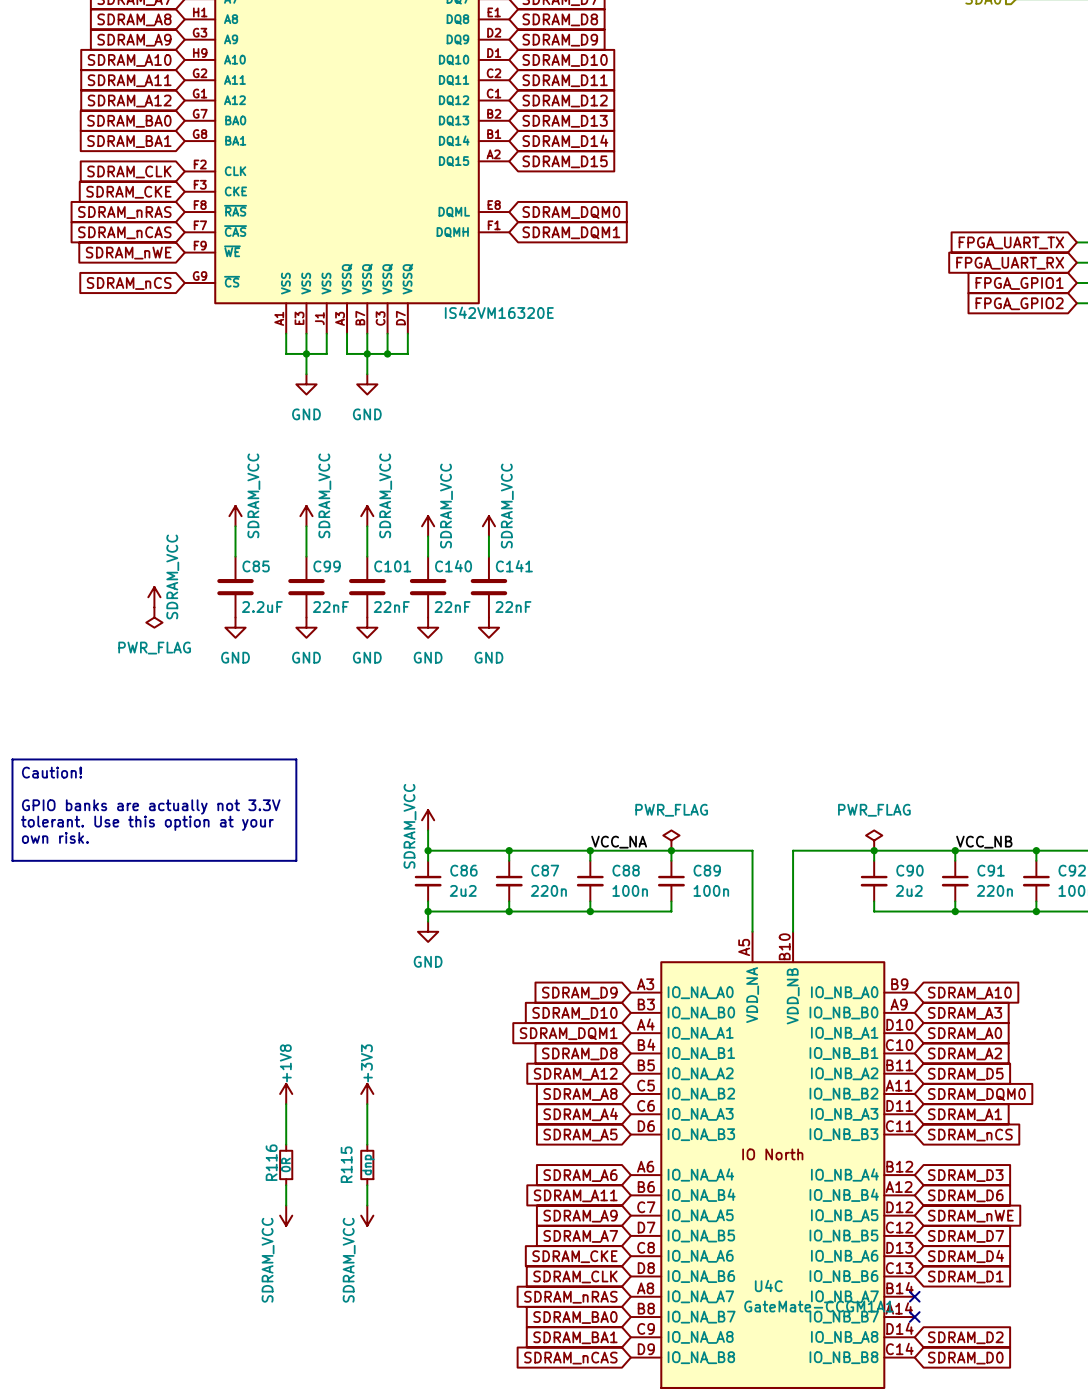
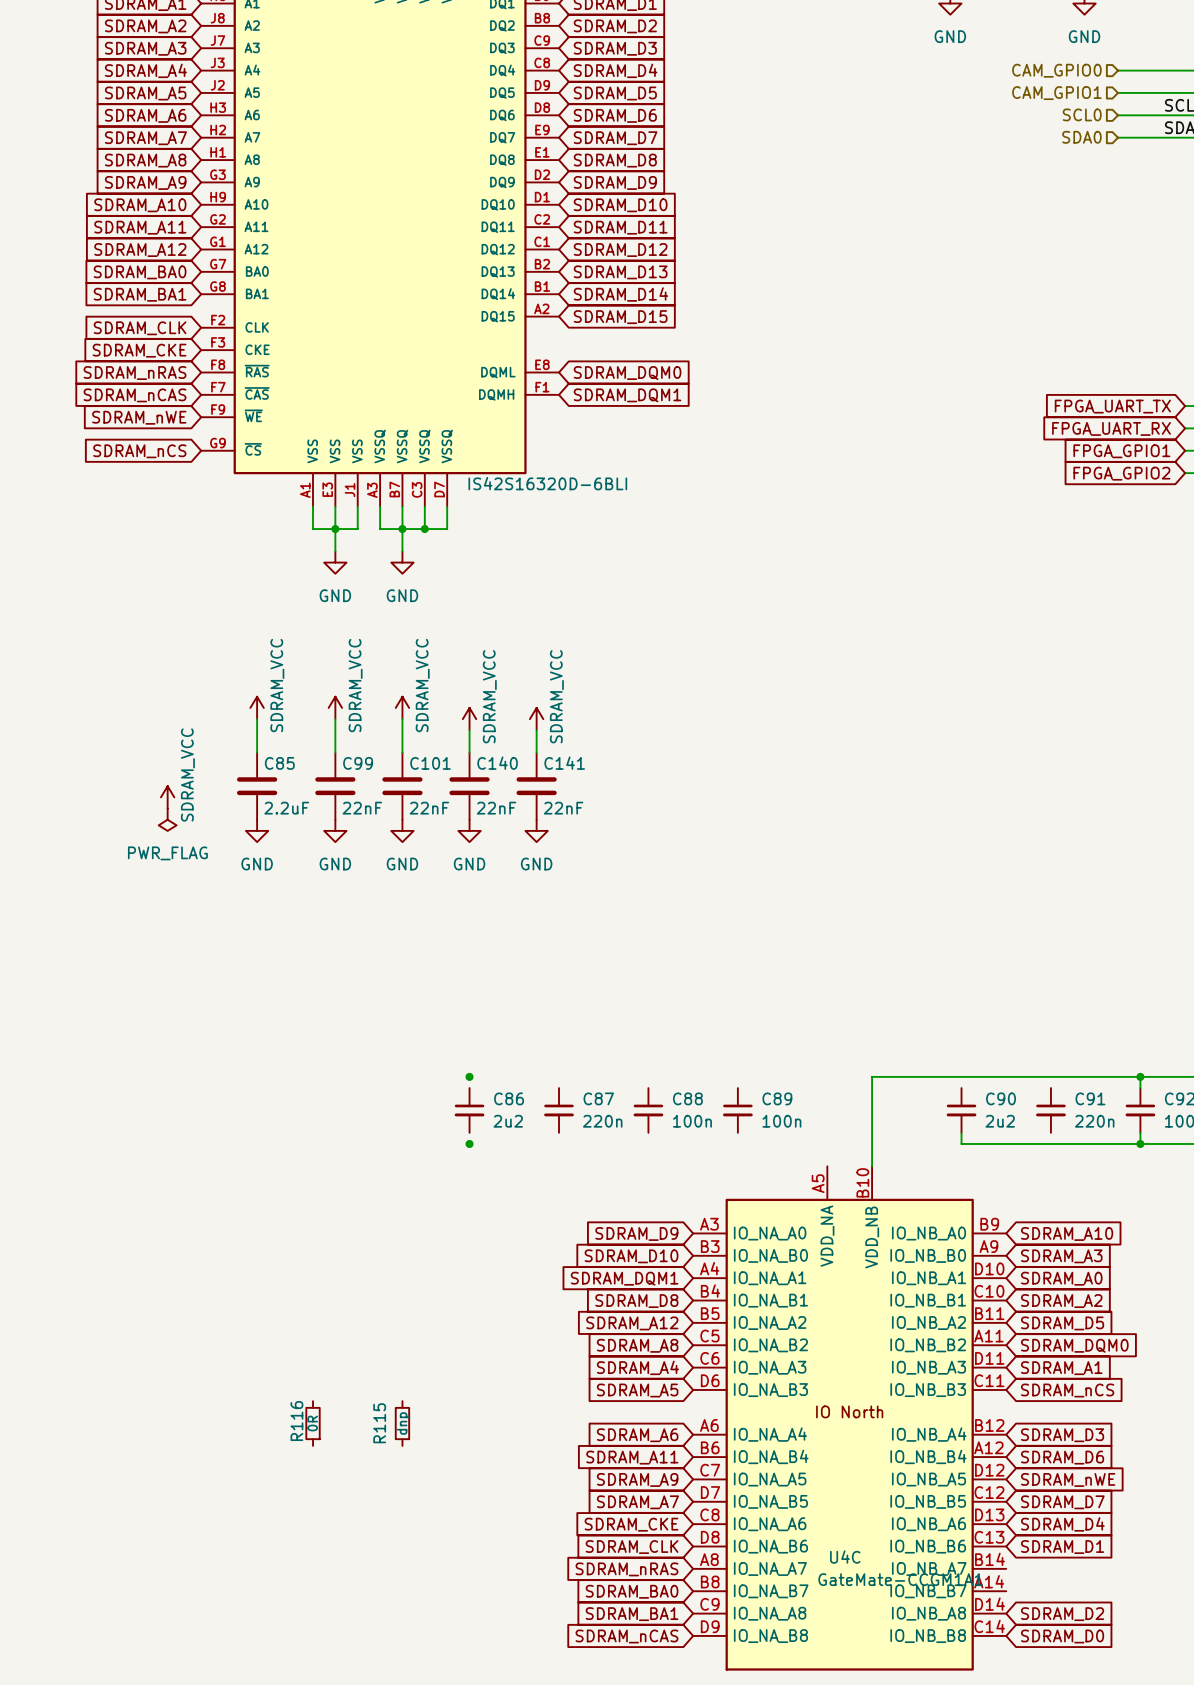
part value: IS42VM16320E (499, 312) -> IS42S16320D-6BLI (547, 483)
line: (12, 759) (296, 759) (296, 860) (12, 860) (12, 759) -> none
text: Caution! (52, 772) -> none
text: GPIO banks are actually not 3.3V (151, 806) -> none
power symbol: SDRAM_VCC (428, 820) -> none
text: tolerant. Use this option at your (147, 823) -> none
wire: (428, 830) (428, 860) -> none
text: own risk. (55, 837) -> none
power symbol: PWR_FLAG (671, 840) -> none
power symbol: PWR_FLAG (874, 840) -> none
label: VCC_NA (619, 842) -> none
label: VCC_NB (984, 842) -> none
wire: (428, 850) (752, 850) (752, 931) -> none
wire: (509, 850) (509, 860) -> none
junction: (509, 850) -> none
wire: (590, 850) (590, 860) -> none
junction: (590, 850) -> none
wire: (671, 850) (671, 860) -> none
junction: (671, 850) -> none
wire: (874, 850) (874, 860) -> none
junction: (874, 850) -> none
wire: (955, 850) (955, 860) -> none
junction: (955, 850) -> none
wire: (428, 901) (428, 921) -> none
wire: (509, 901) (509, 911) -> none
wire: (590, 901) (590, 911) -> none
wire: (671, 901) (671, 911) (428, 911) -> none
wire: (955, 901) (955, 911) -> none
junction: (509, 911) -> none
junction: (590, 911) -> none
junction: (955, 911) -> none
power symbol: GND (428, 931) -> none
power symbol: +1V8 (286, 1093) -> none
power symbol: +3V3 (367, 1093) -> none
wire: (286, 1104) (286, 1144) -> none
wire: (367, 1104) (367, 1144) -> none
wire: (286, 1185) (286, 1205) -> none
wire: (367, 1185) (367, 1205) -> none
power symbol: SDRAM_VCC (286, 1215) -> none
power symbol: SDRAM_VCC (367, 1215) -> none
no-connect mark: (914, 1296) -> none
no-connect mark: (914, 1317) -> none

